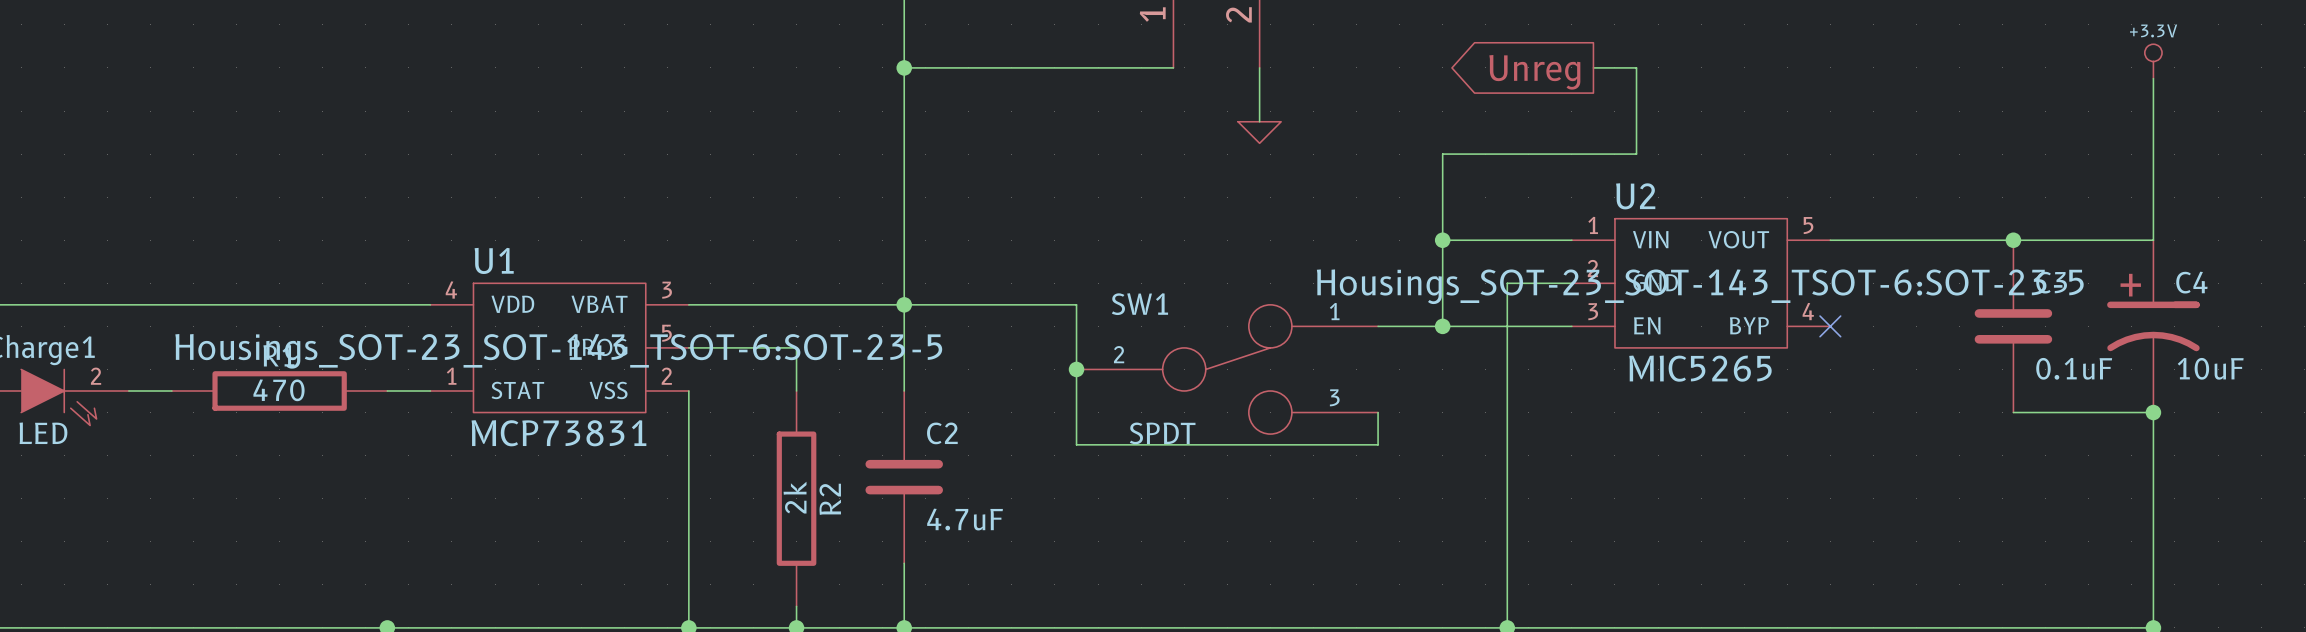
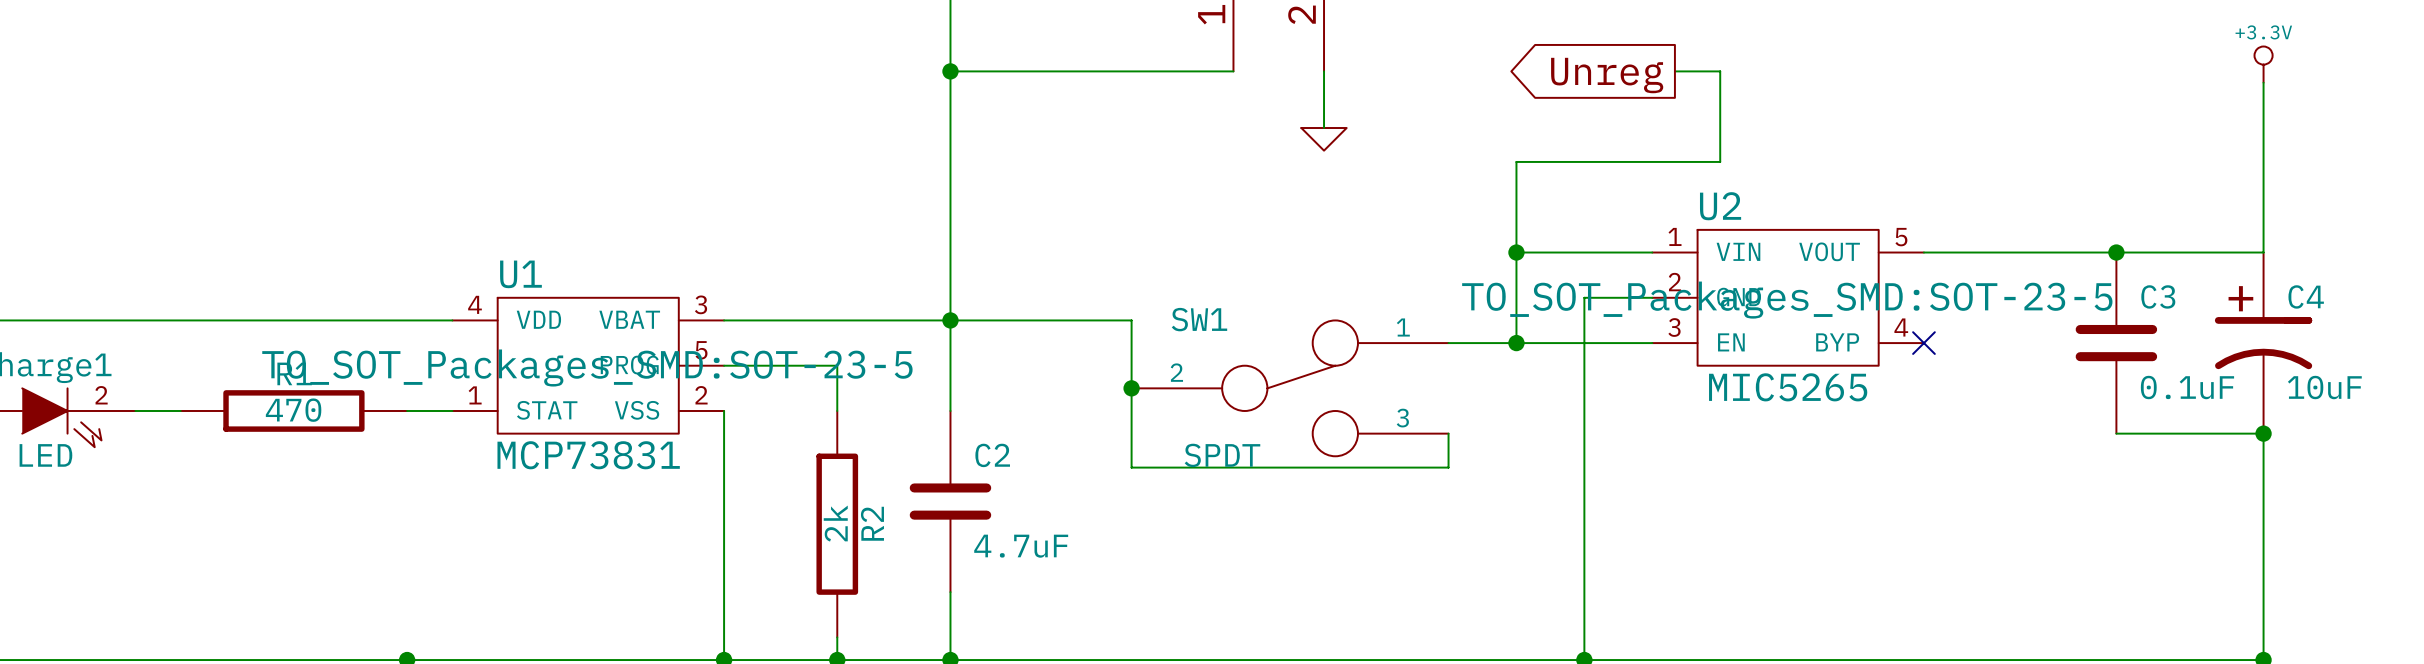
U2 text: Housings_SOT-23_SOT-143_TSOT-6:SOT-23-5 (1700, 286) -> TO_SOT_Packages_SMD:SOT-23-5 (1787, 300)
U1 text: Housings_SOT-23_SOT-143_TSOT-6:SOT-23-5 (558, 351) -> TO_SOT_Packages_SMD:SOT-23-5 (587, 368)

